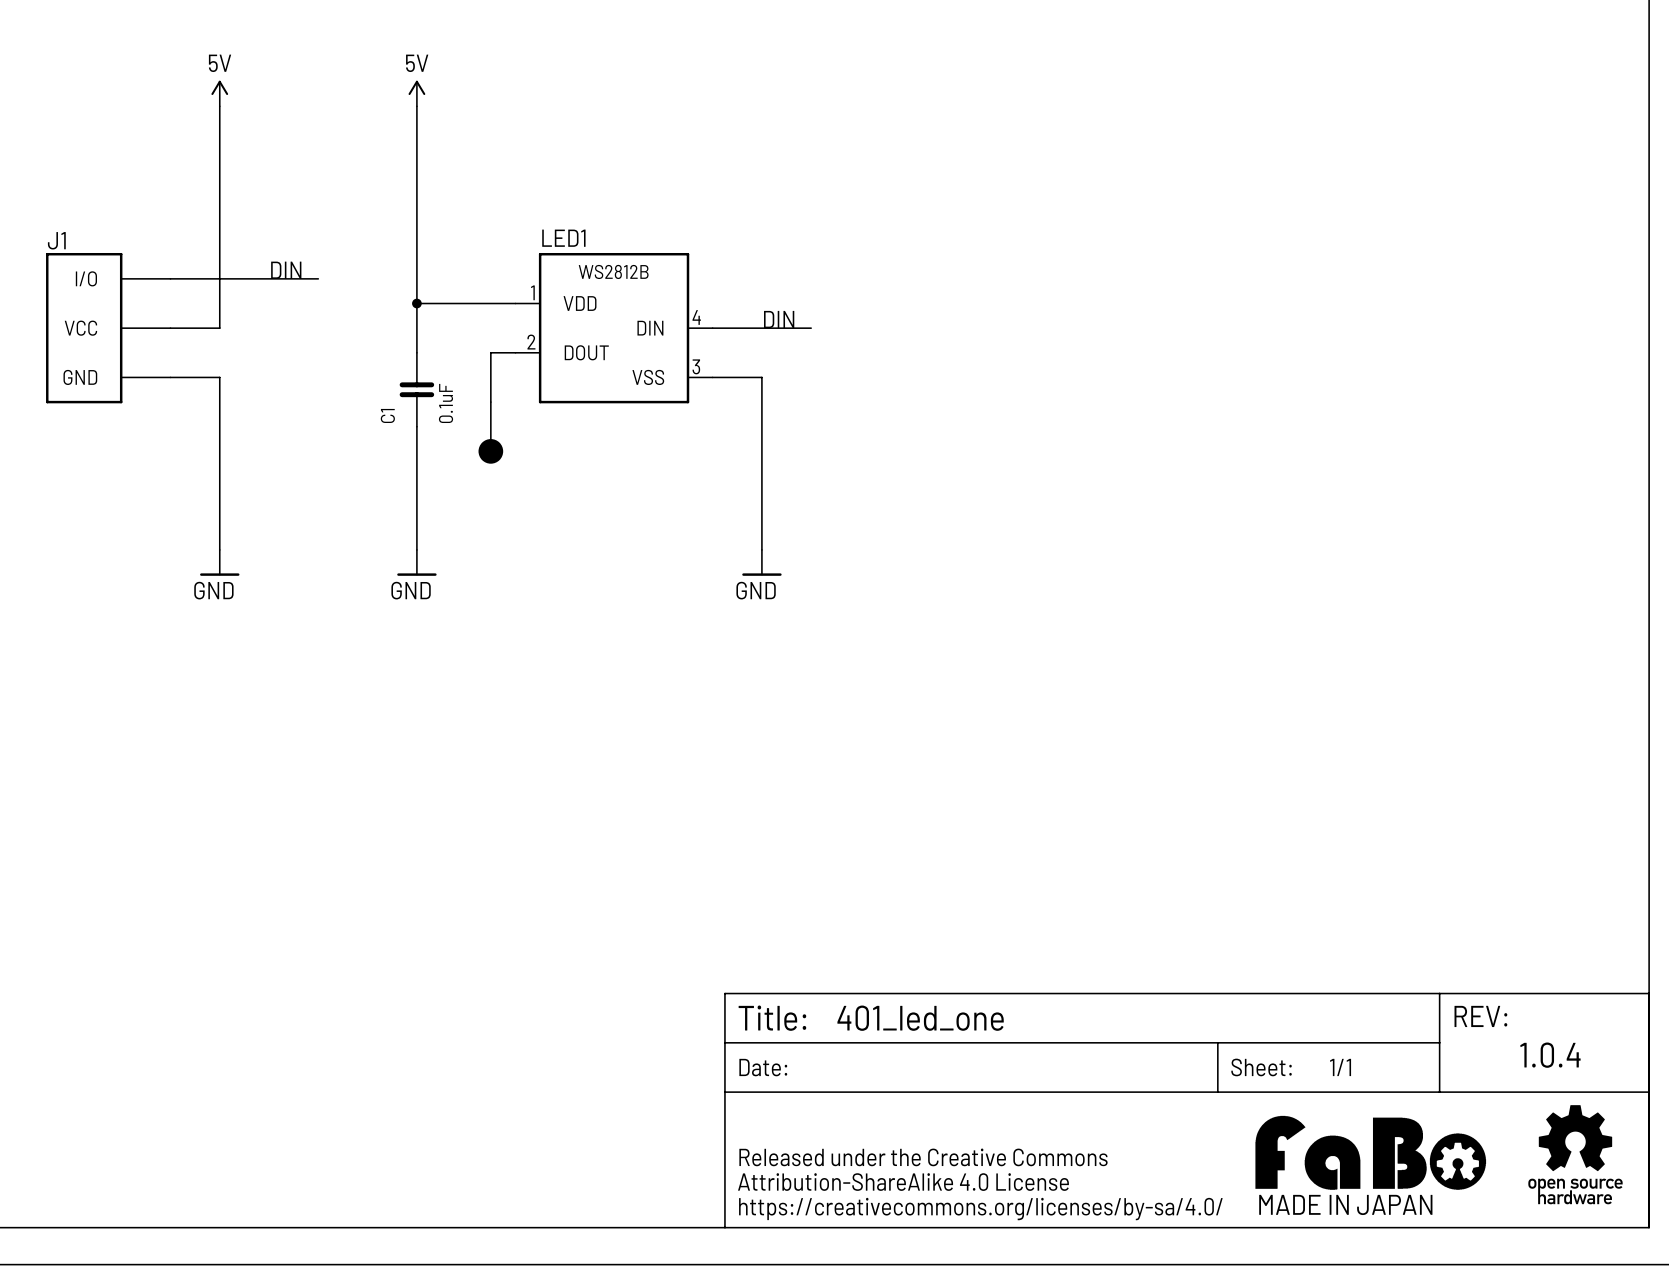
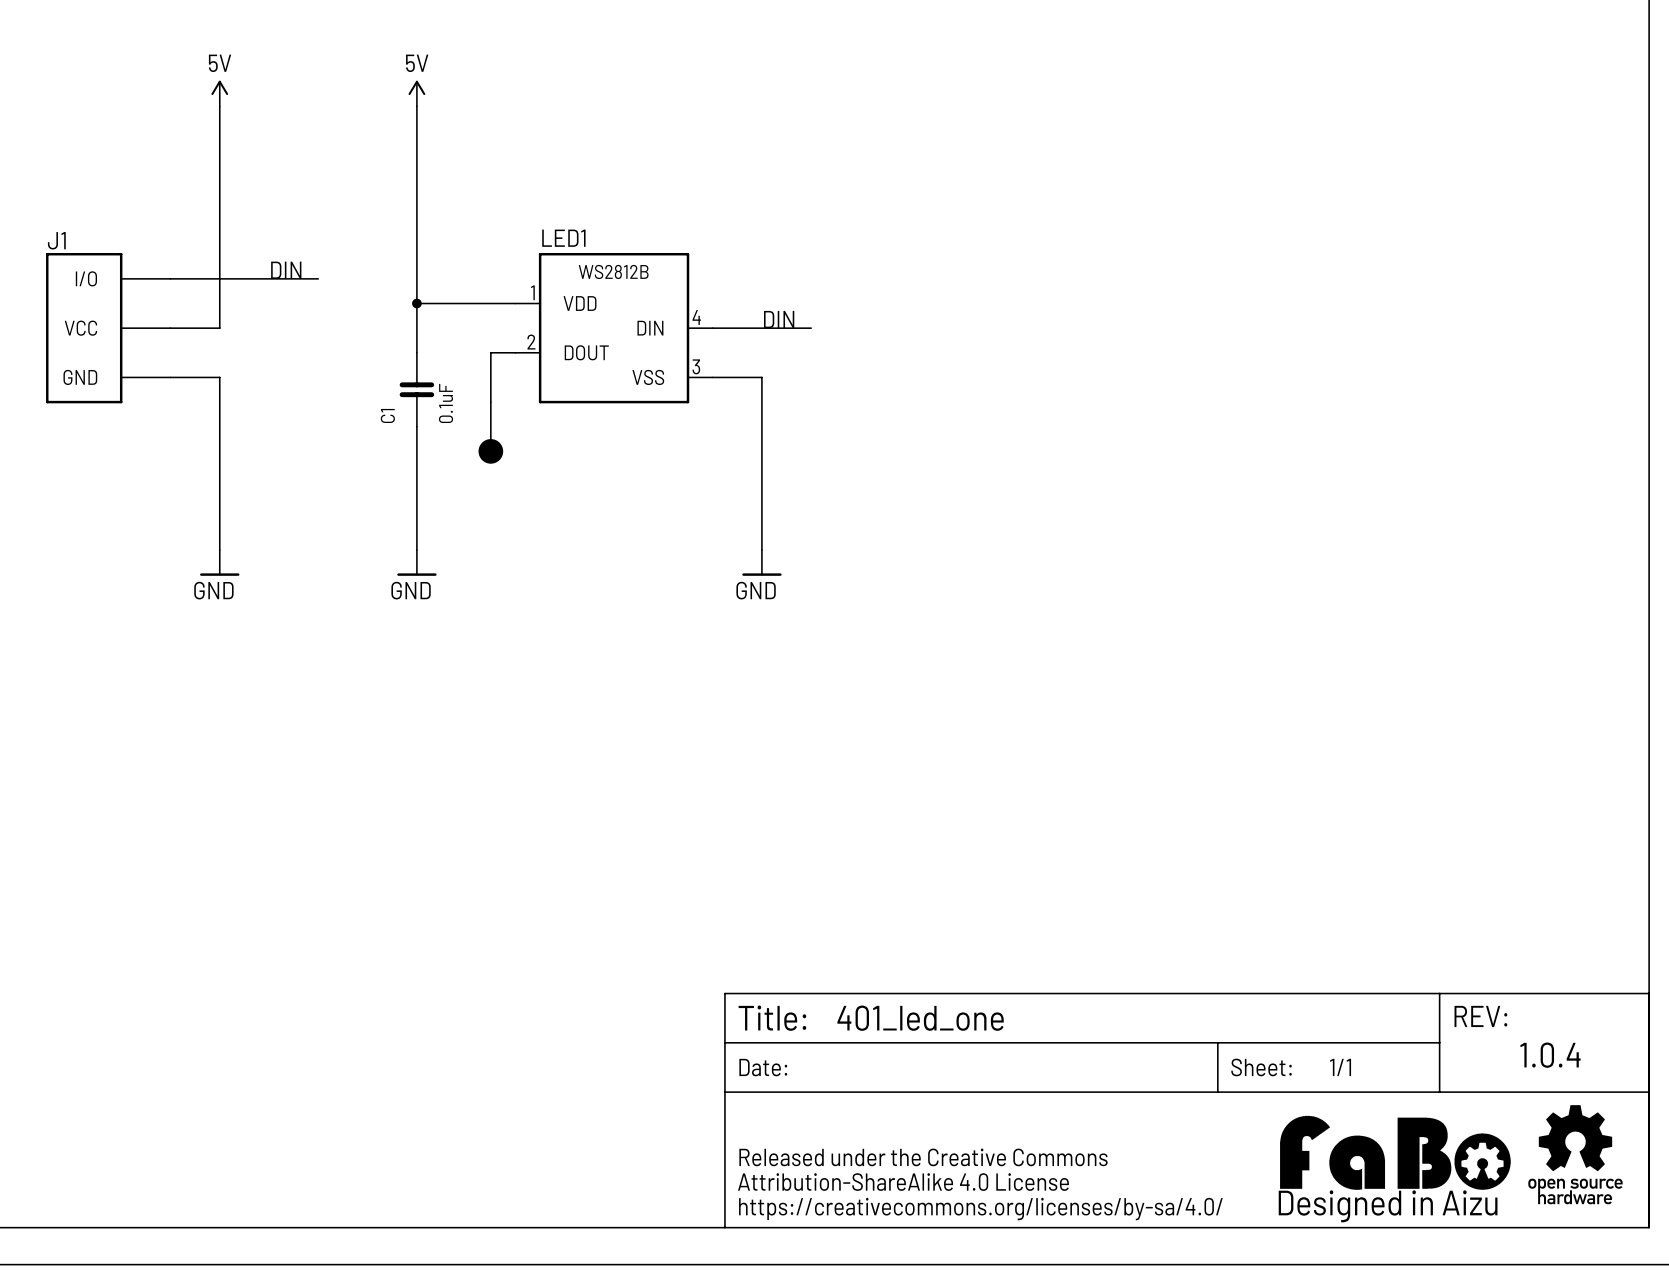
part: (1370, 1152) -> none
part: none -> (1395, 1152)

